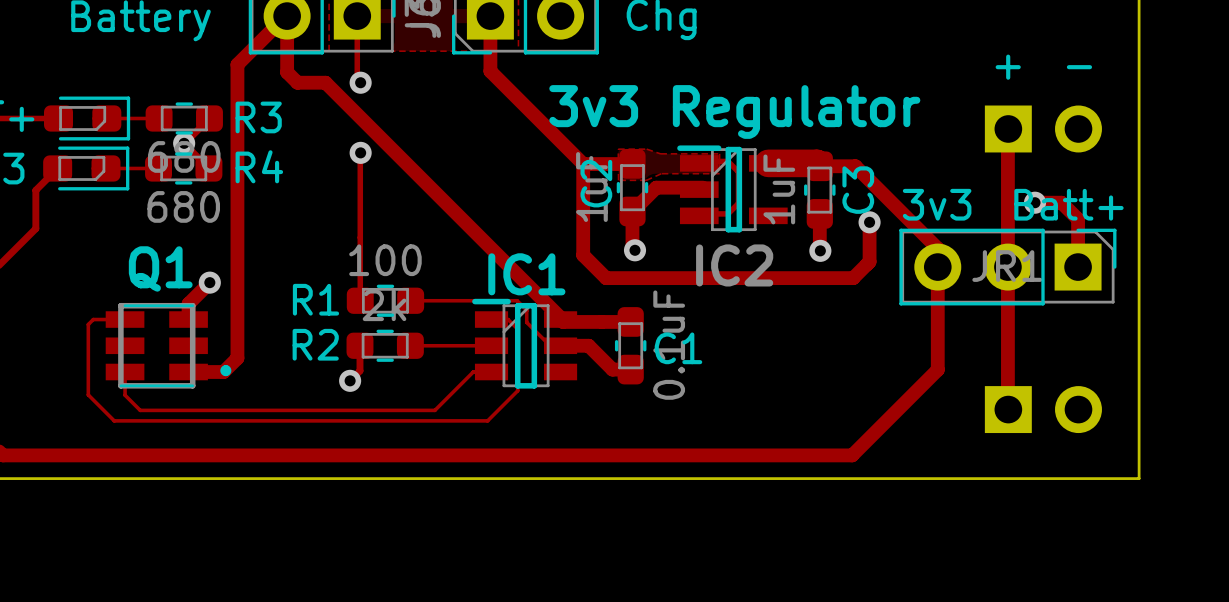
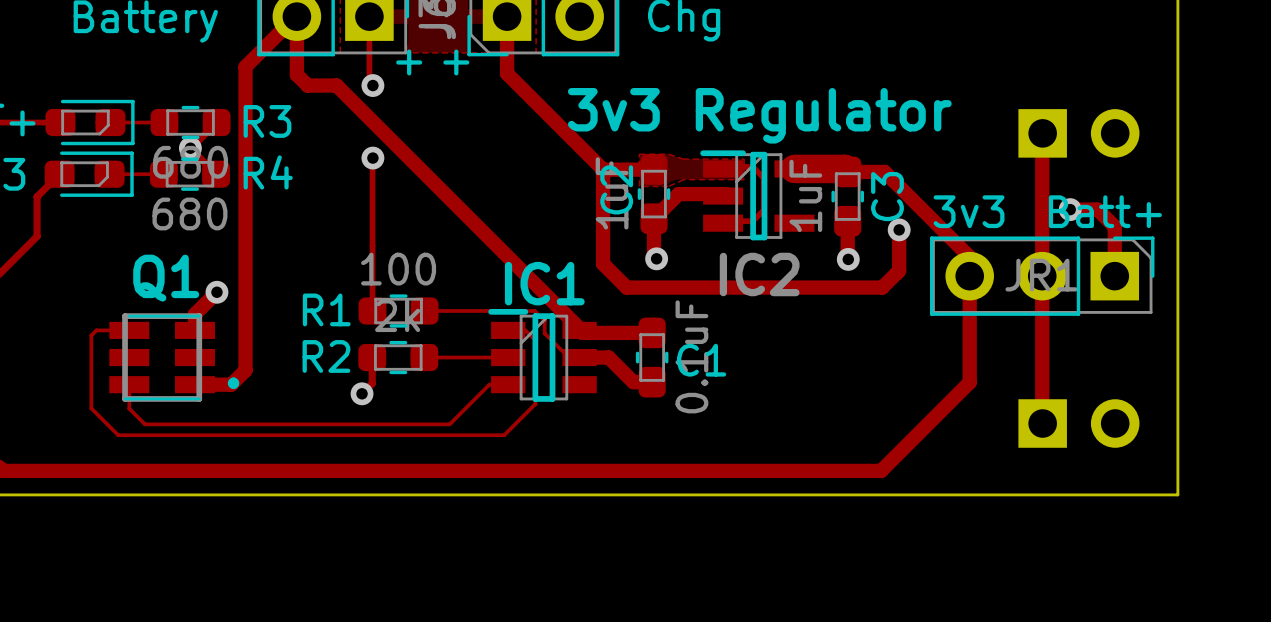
text: none -> + (409, 62)
text: none -> + (456, 62)
text: + (1008, 67) -> none
text: - (1079, 67) -> none

